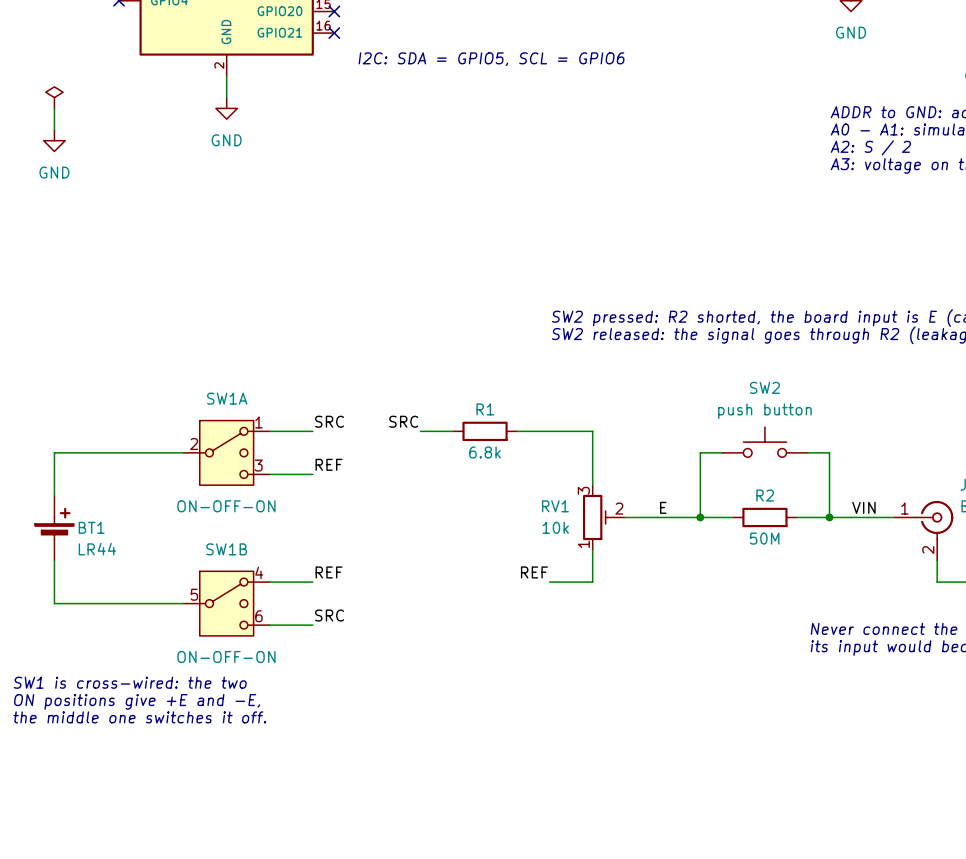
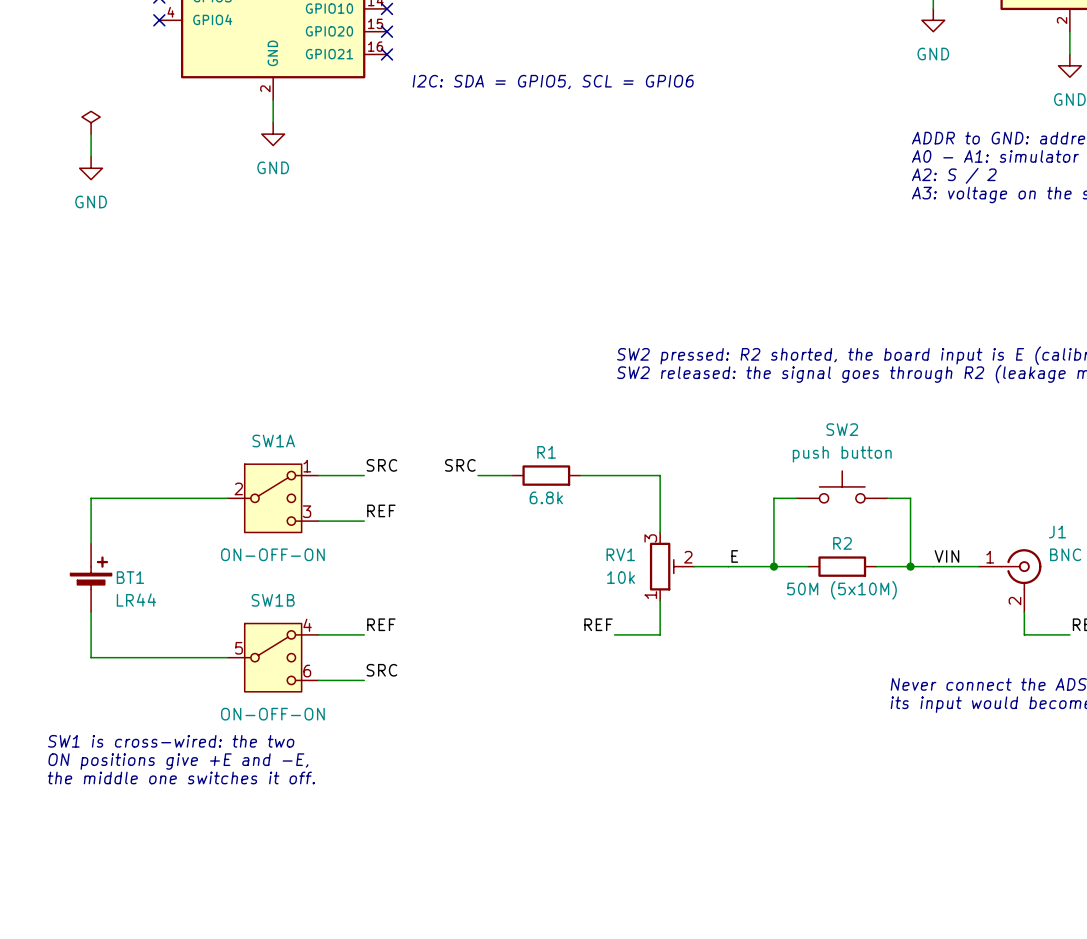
R2 value: 50M (764, 538) -> 50M (5x10M) (841, 590)

